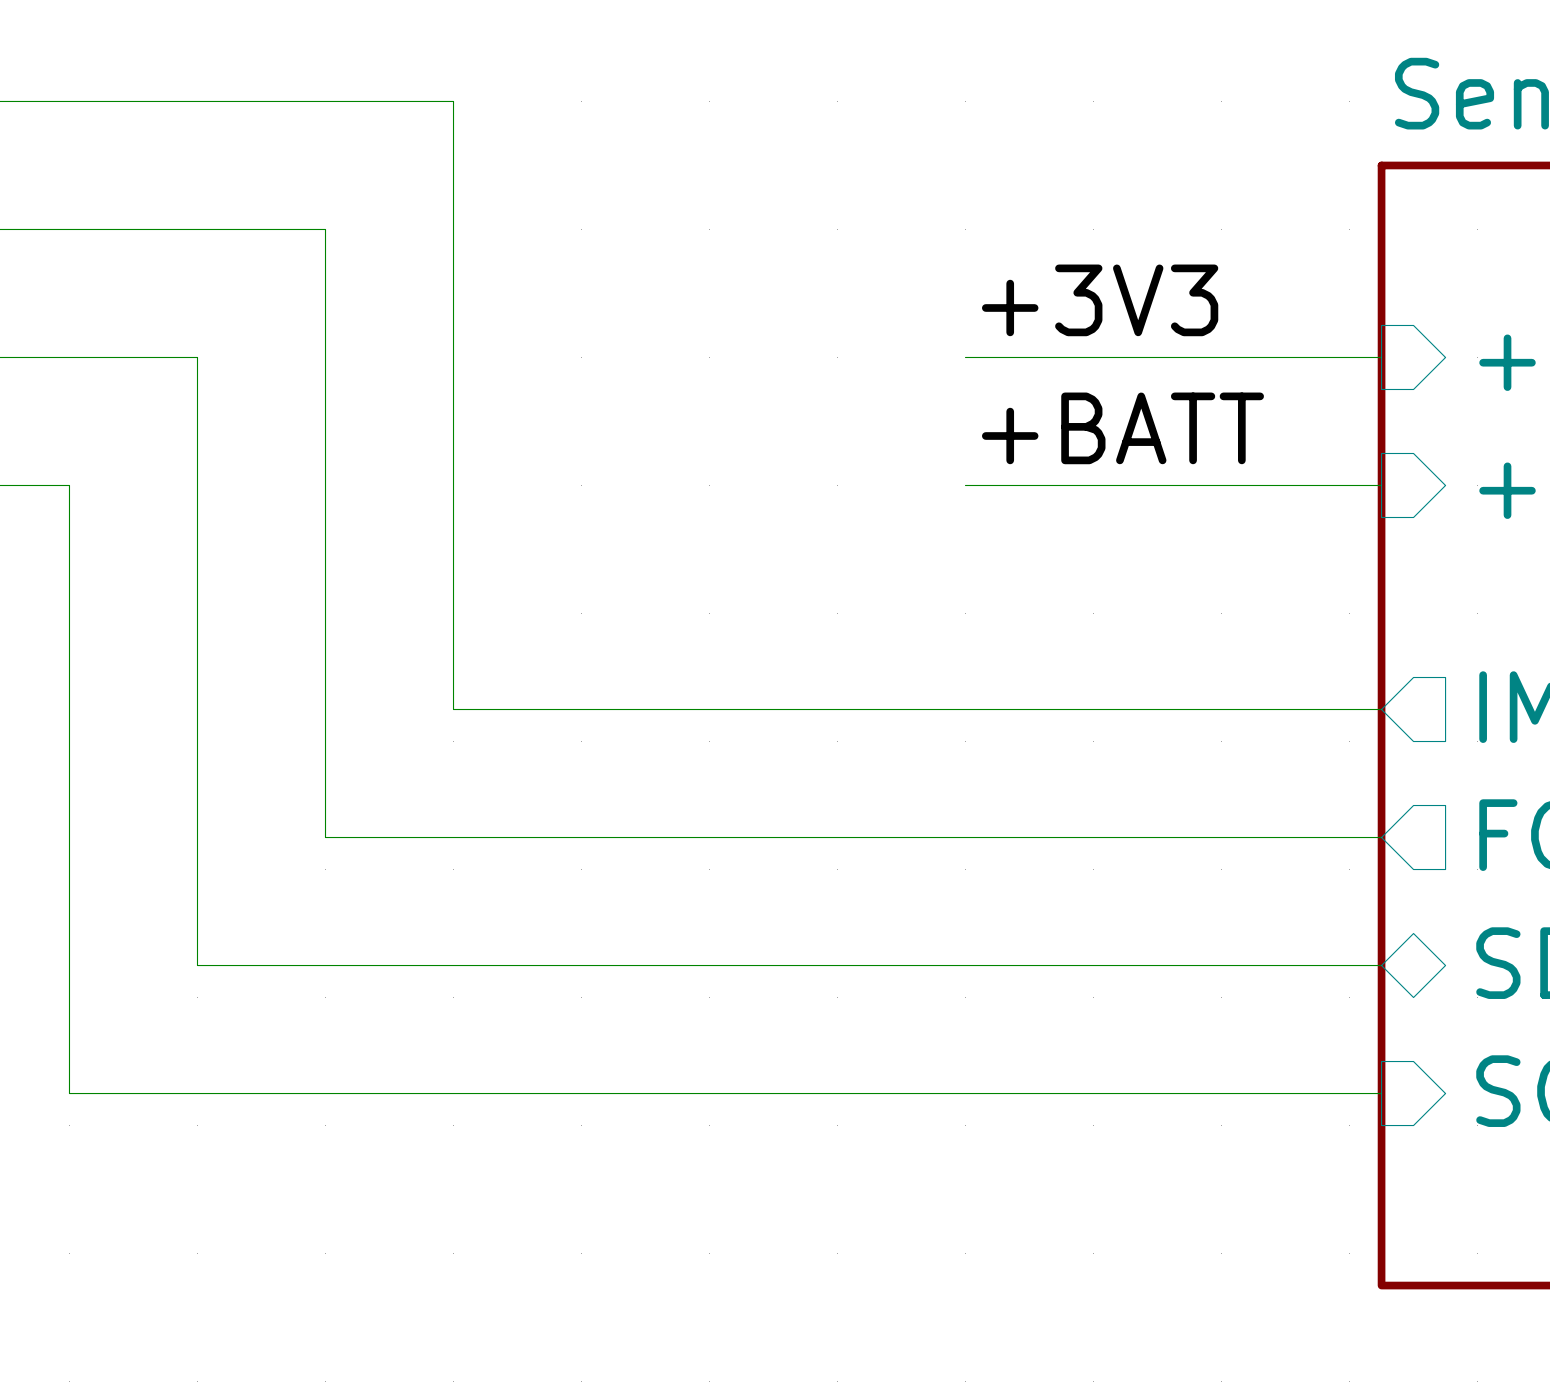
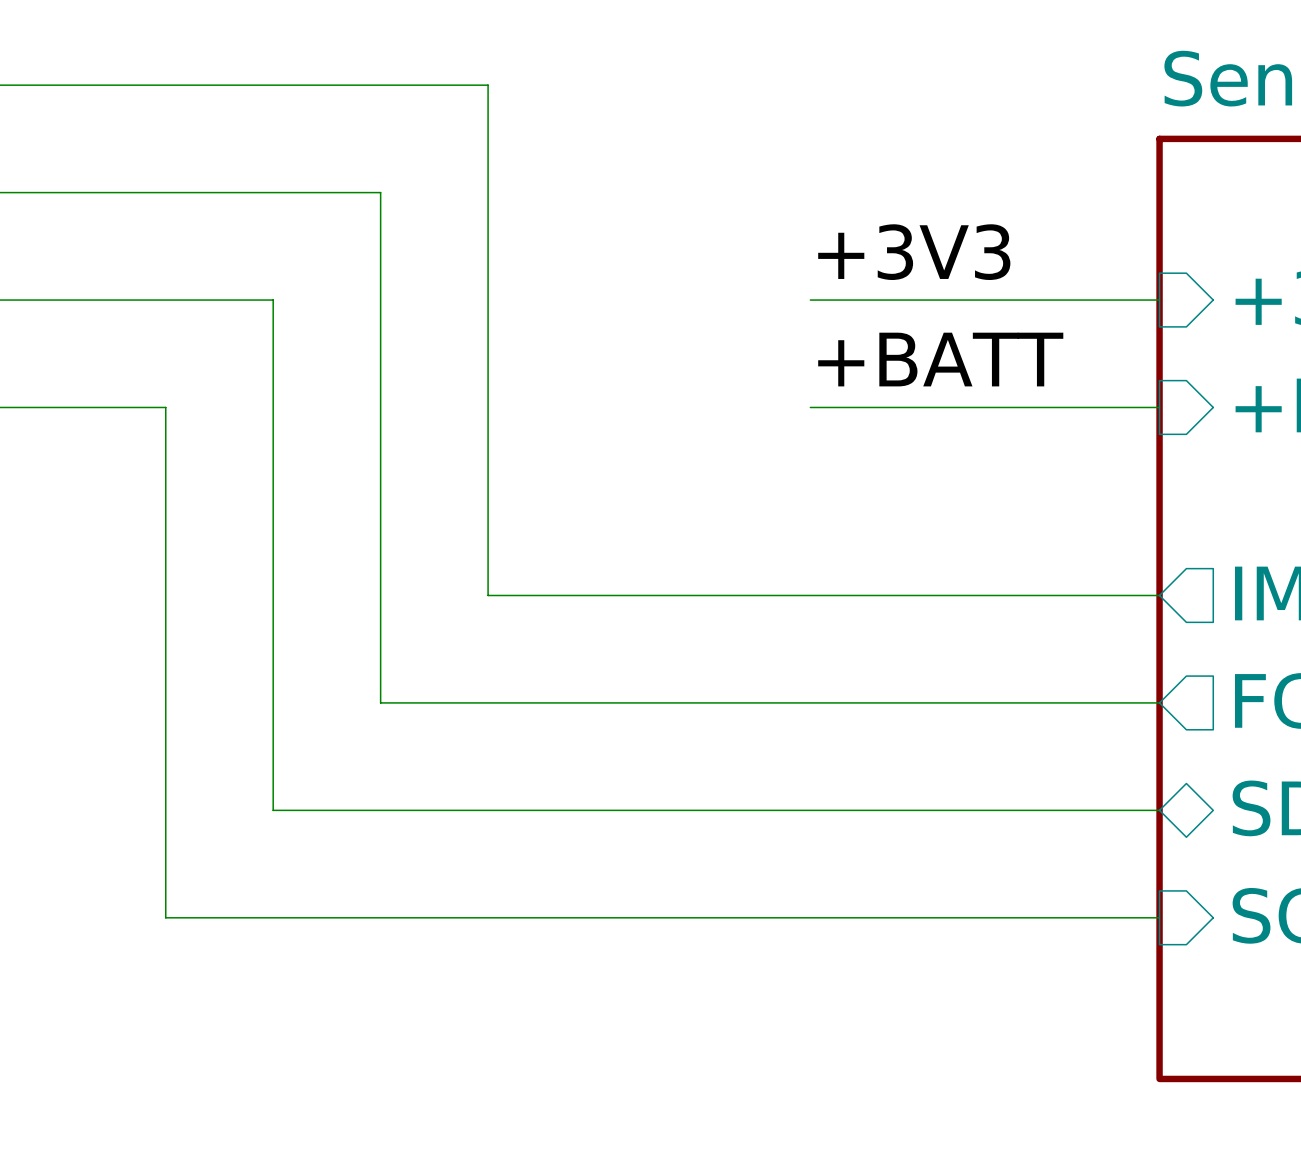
wire: (453, 101) (453, 229) -> (273, 192) (380, 192)
wire: none -> (380, 85) (488, 85) (488, 595)
wire: (325, 229) (325, 357) -> (165, 300) (273, 300)
wire: (197, 357) (197, 485) -> (58, 407) (165, 407)
wire: (69, 485) (69, 1093) (197, 1093) -> (165, 810) (165, 917)
wire: (453, 709) (581, 709) -> (380, 595) (380, 702)
wire: (325, 837) (453, 837) -> none
wire: (197, 965) (325, 965) -> (273, 702) (273, 810)

